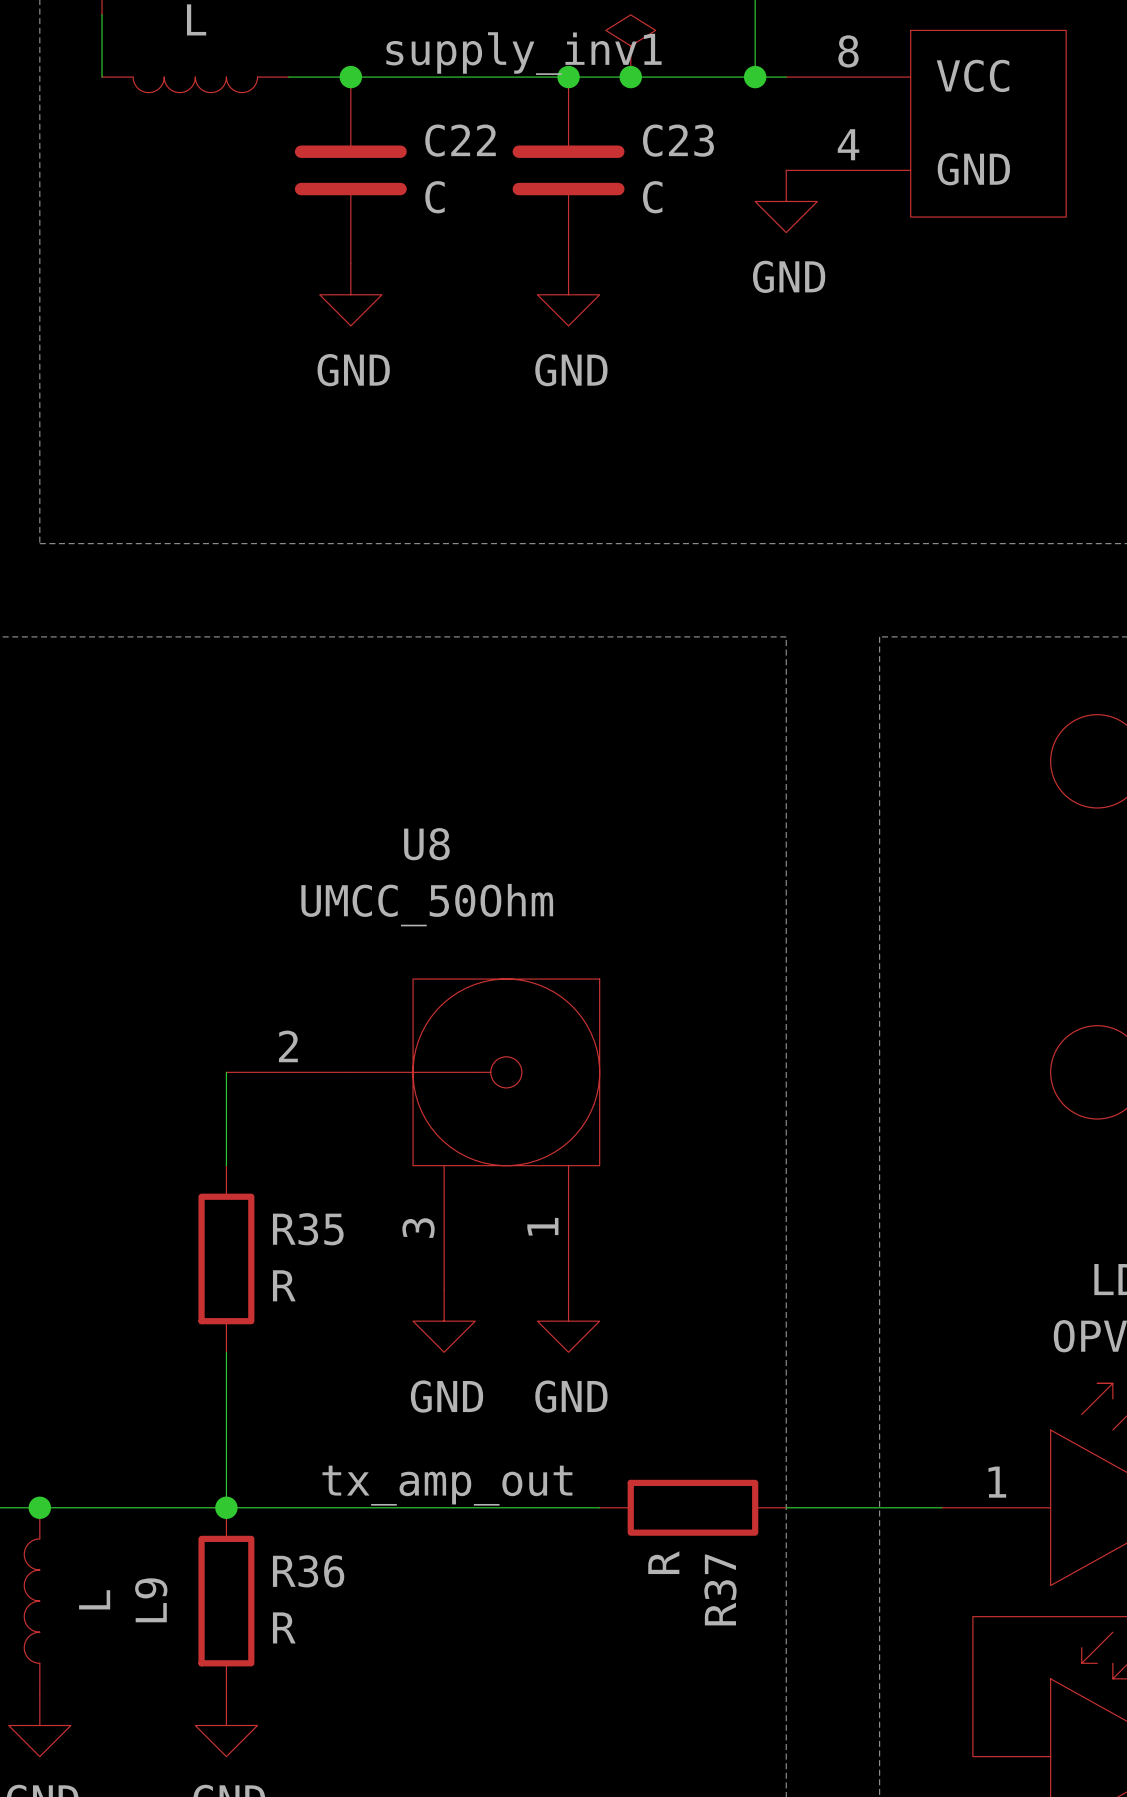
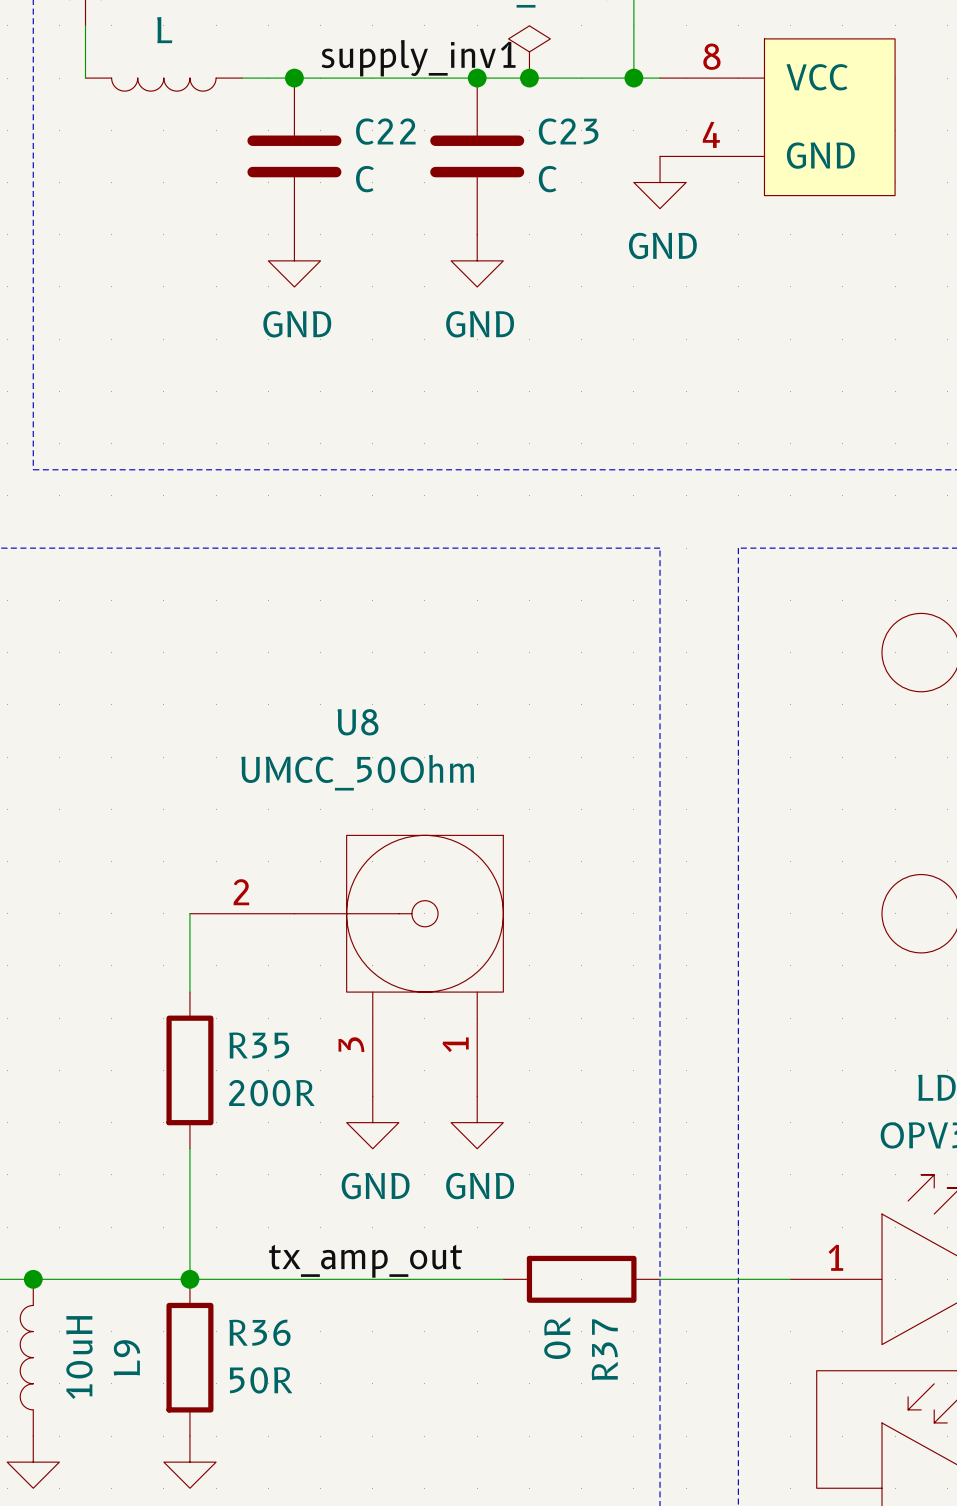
R35 value: R (284, 1285) -> 200R (271, 1093)
R37 value: R (663, 1562) -> 0R (557, 1338)
L9 value: L (94, 1599) -> 10uH (79, 1357)
R36 value: R (284, 1627) -> 50R (261, 1380)

